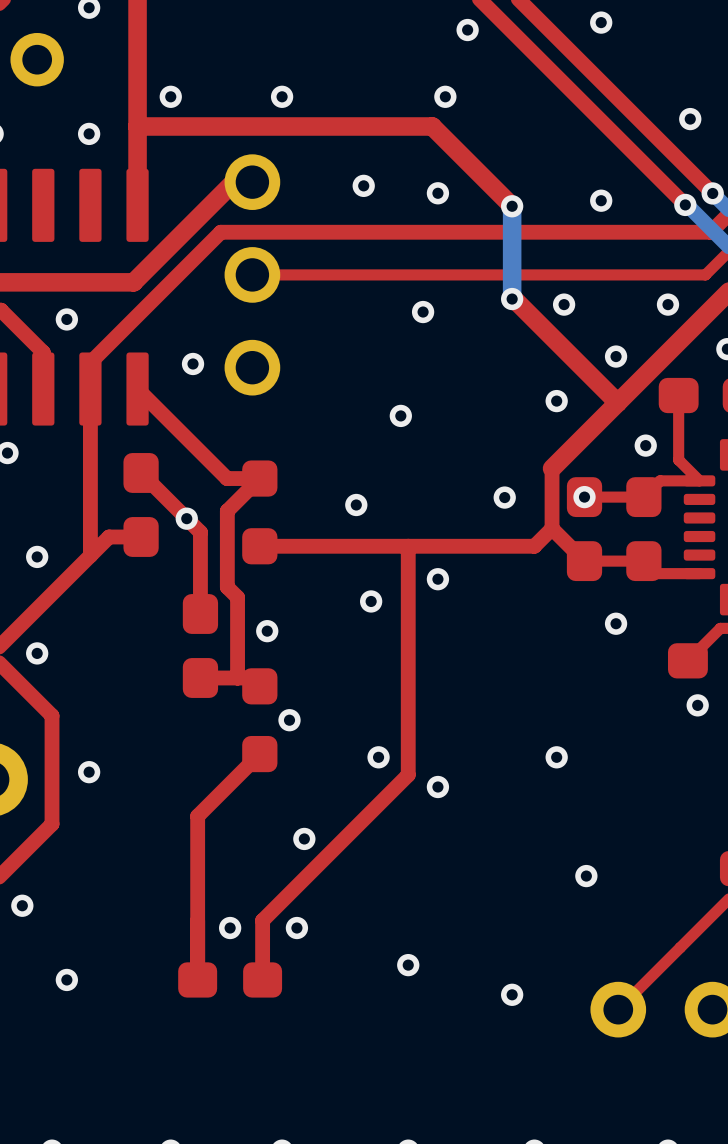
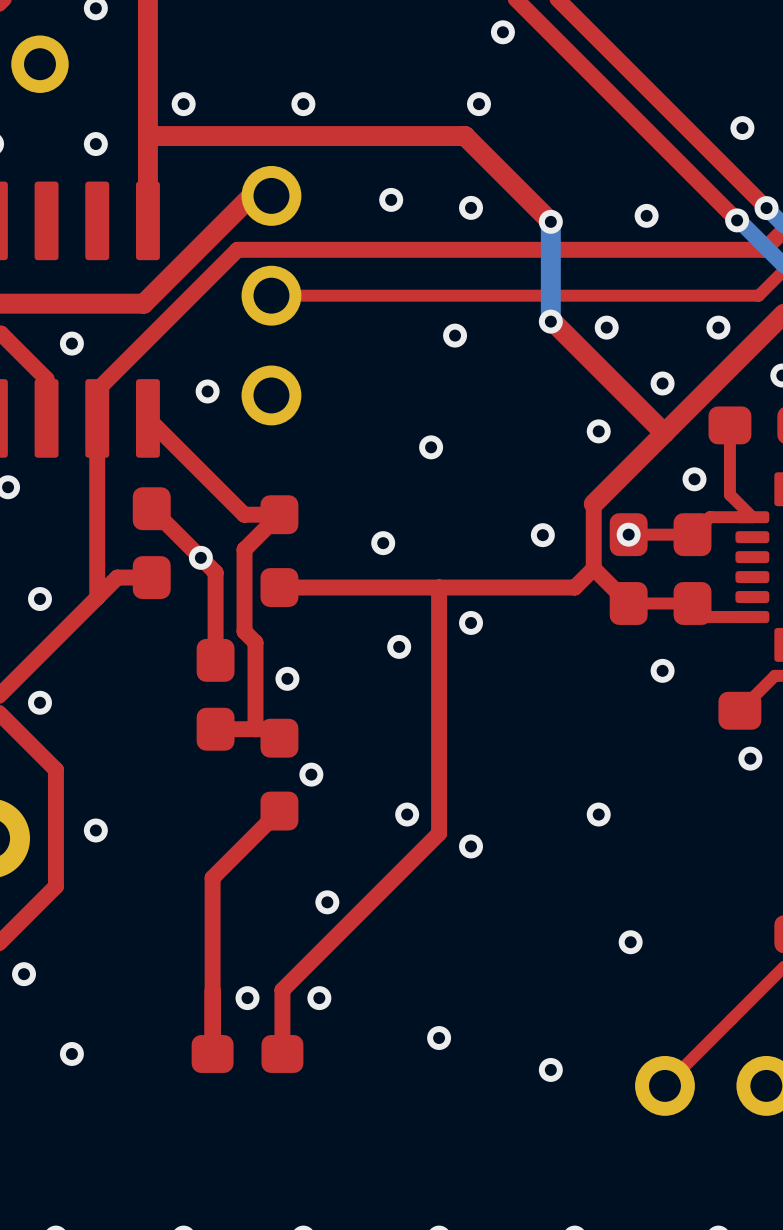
via: (601, 22) -> none

